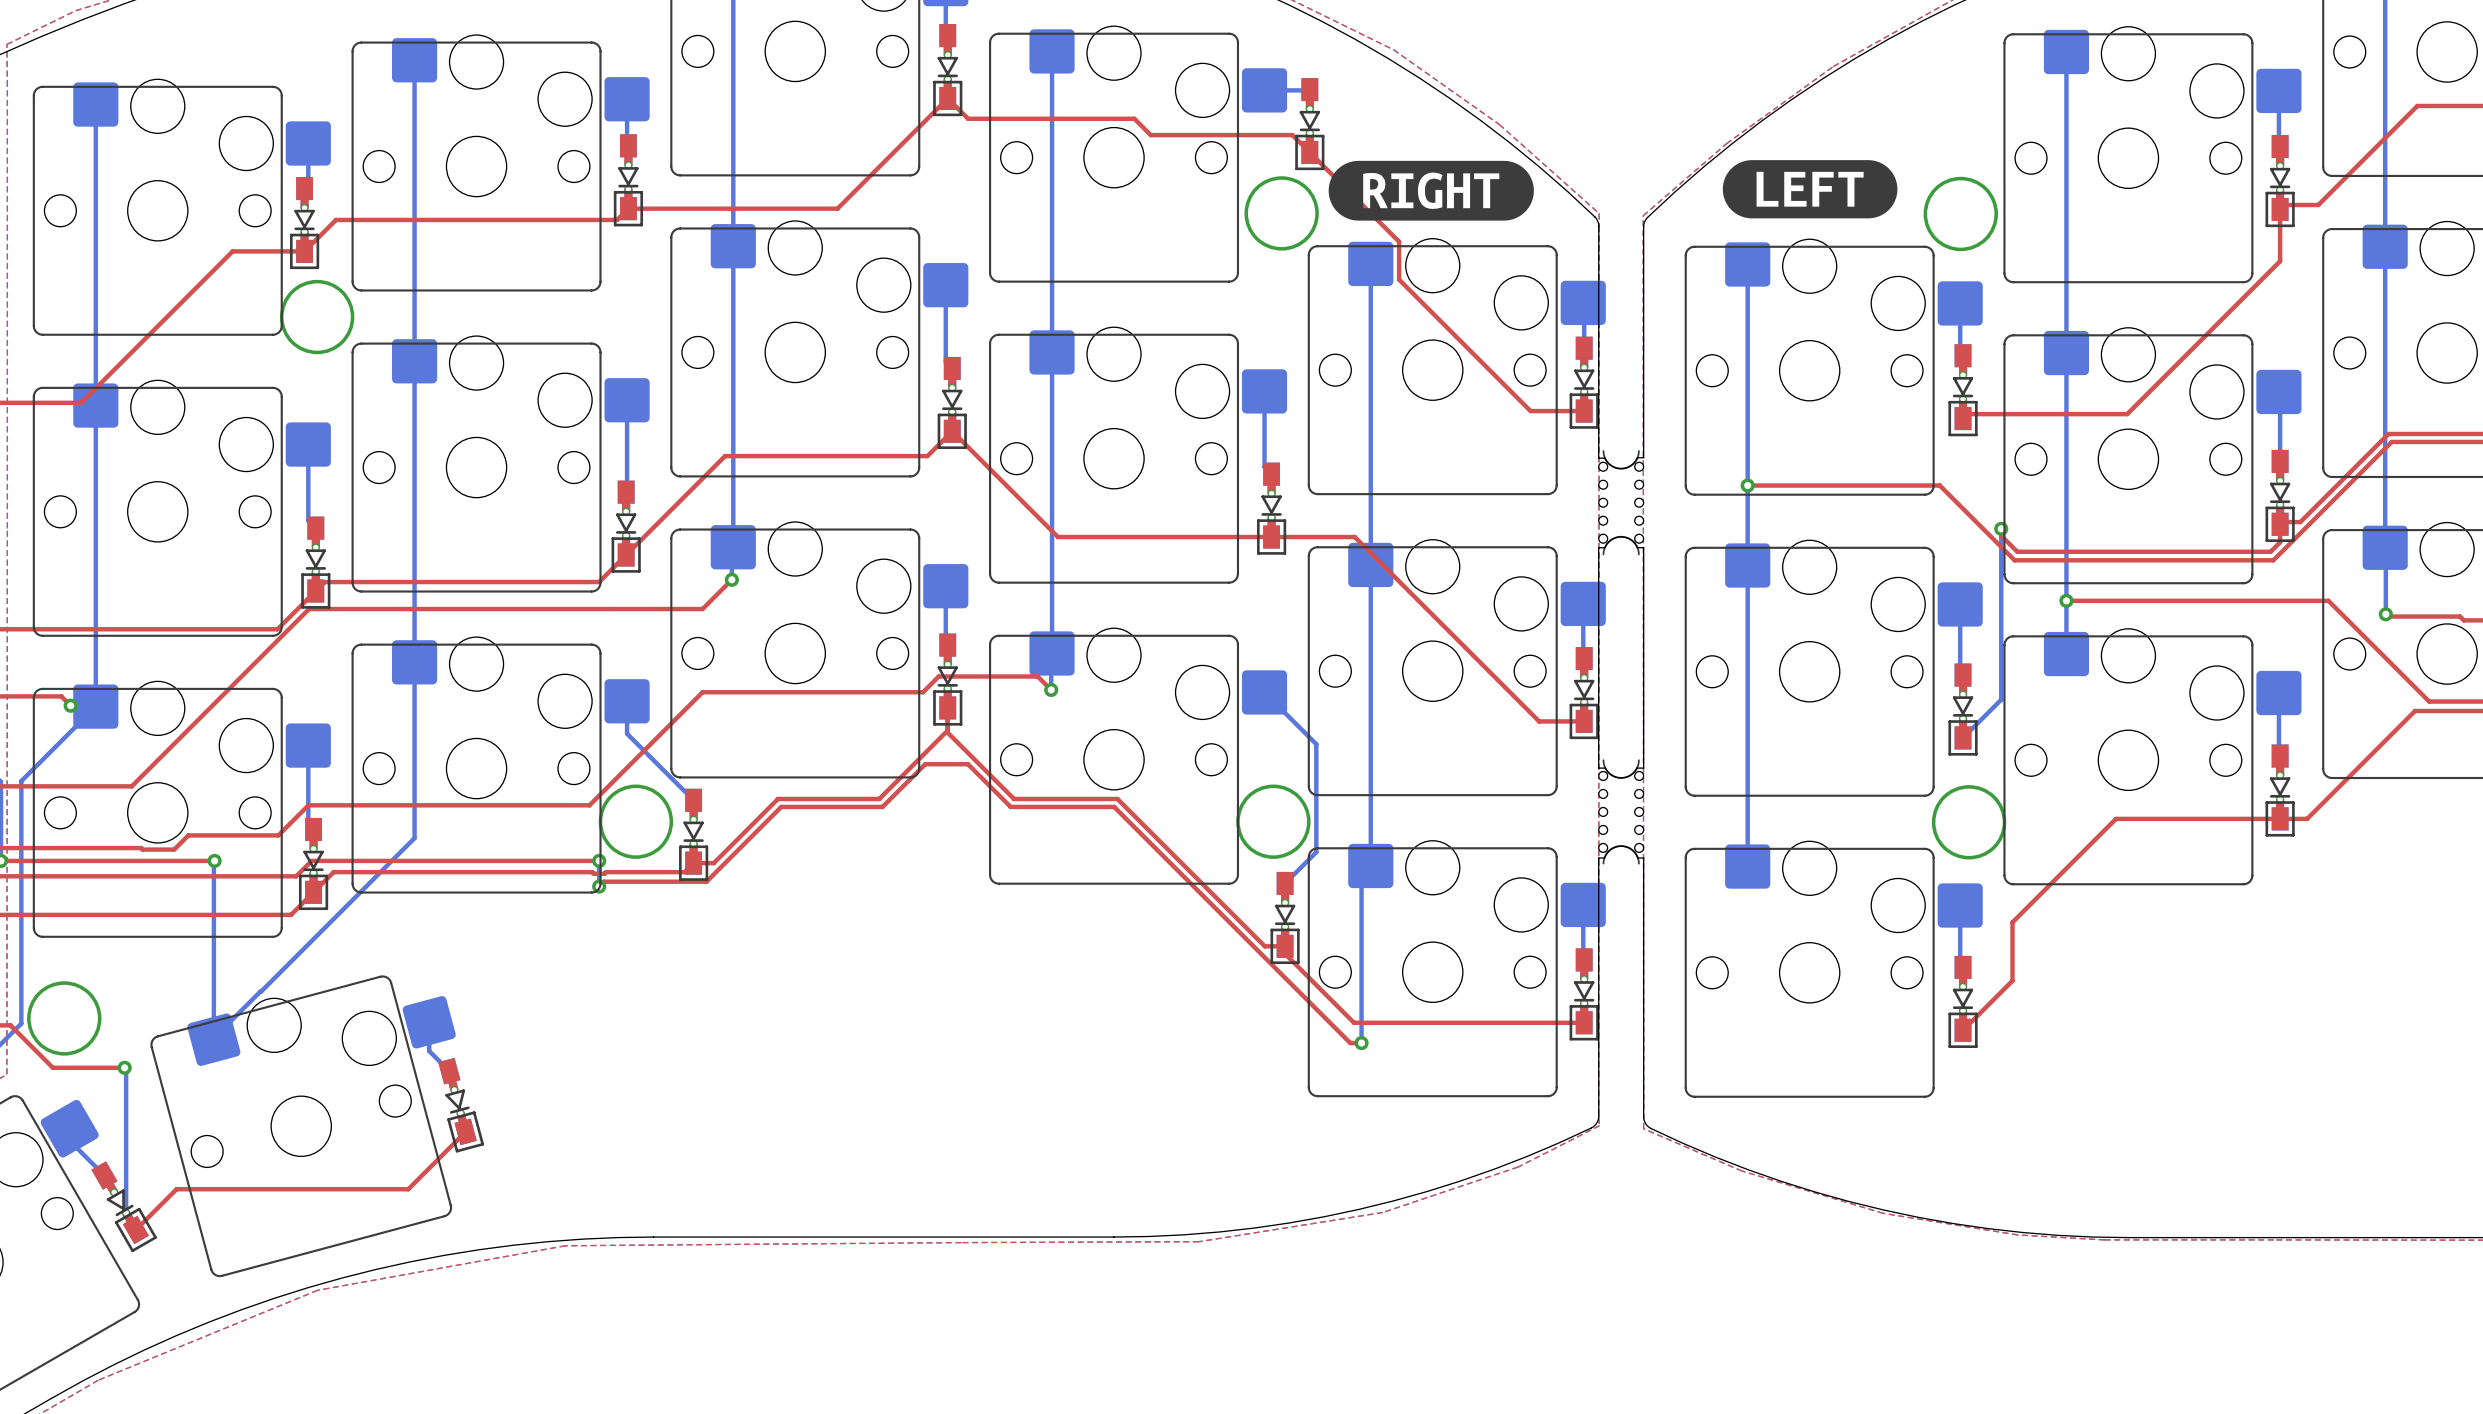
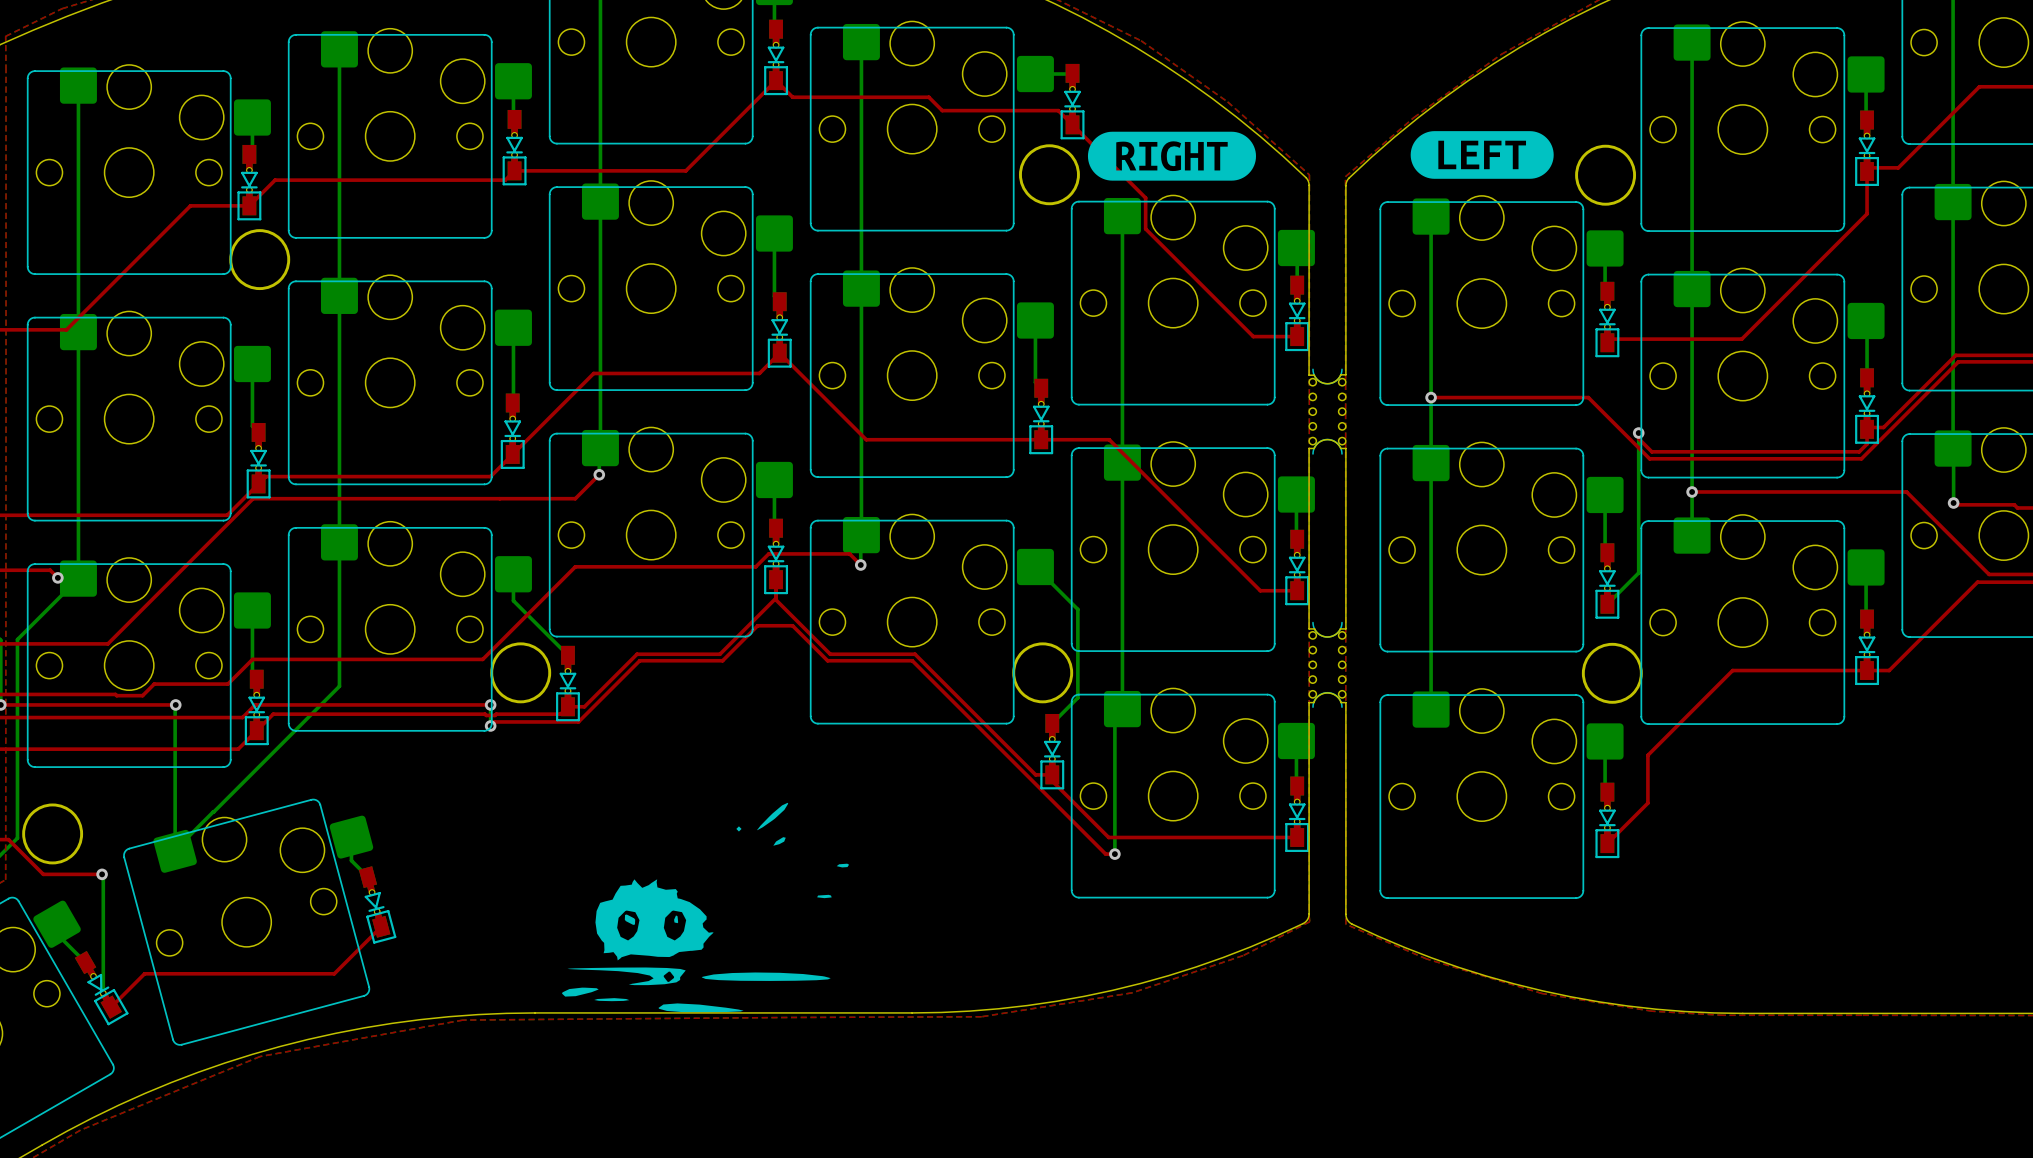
drawing: none -> [562, 802, 850, 1013]

